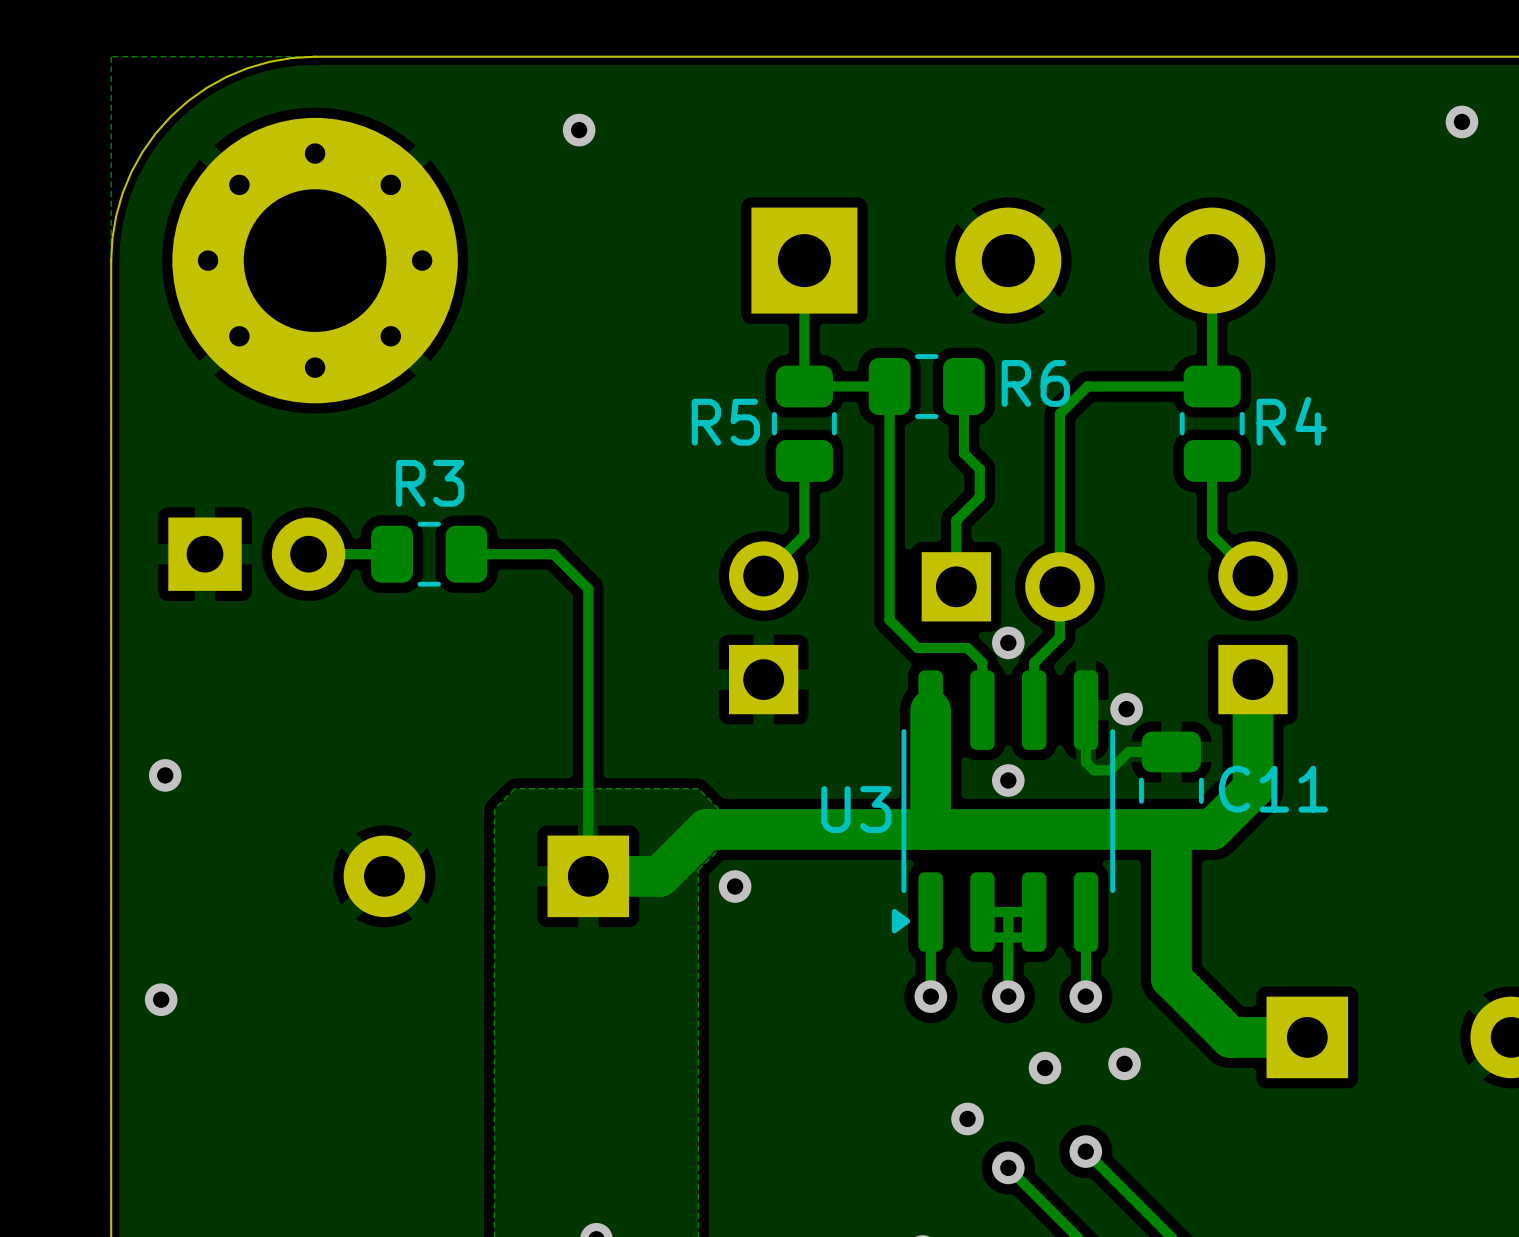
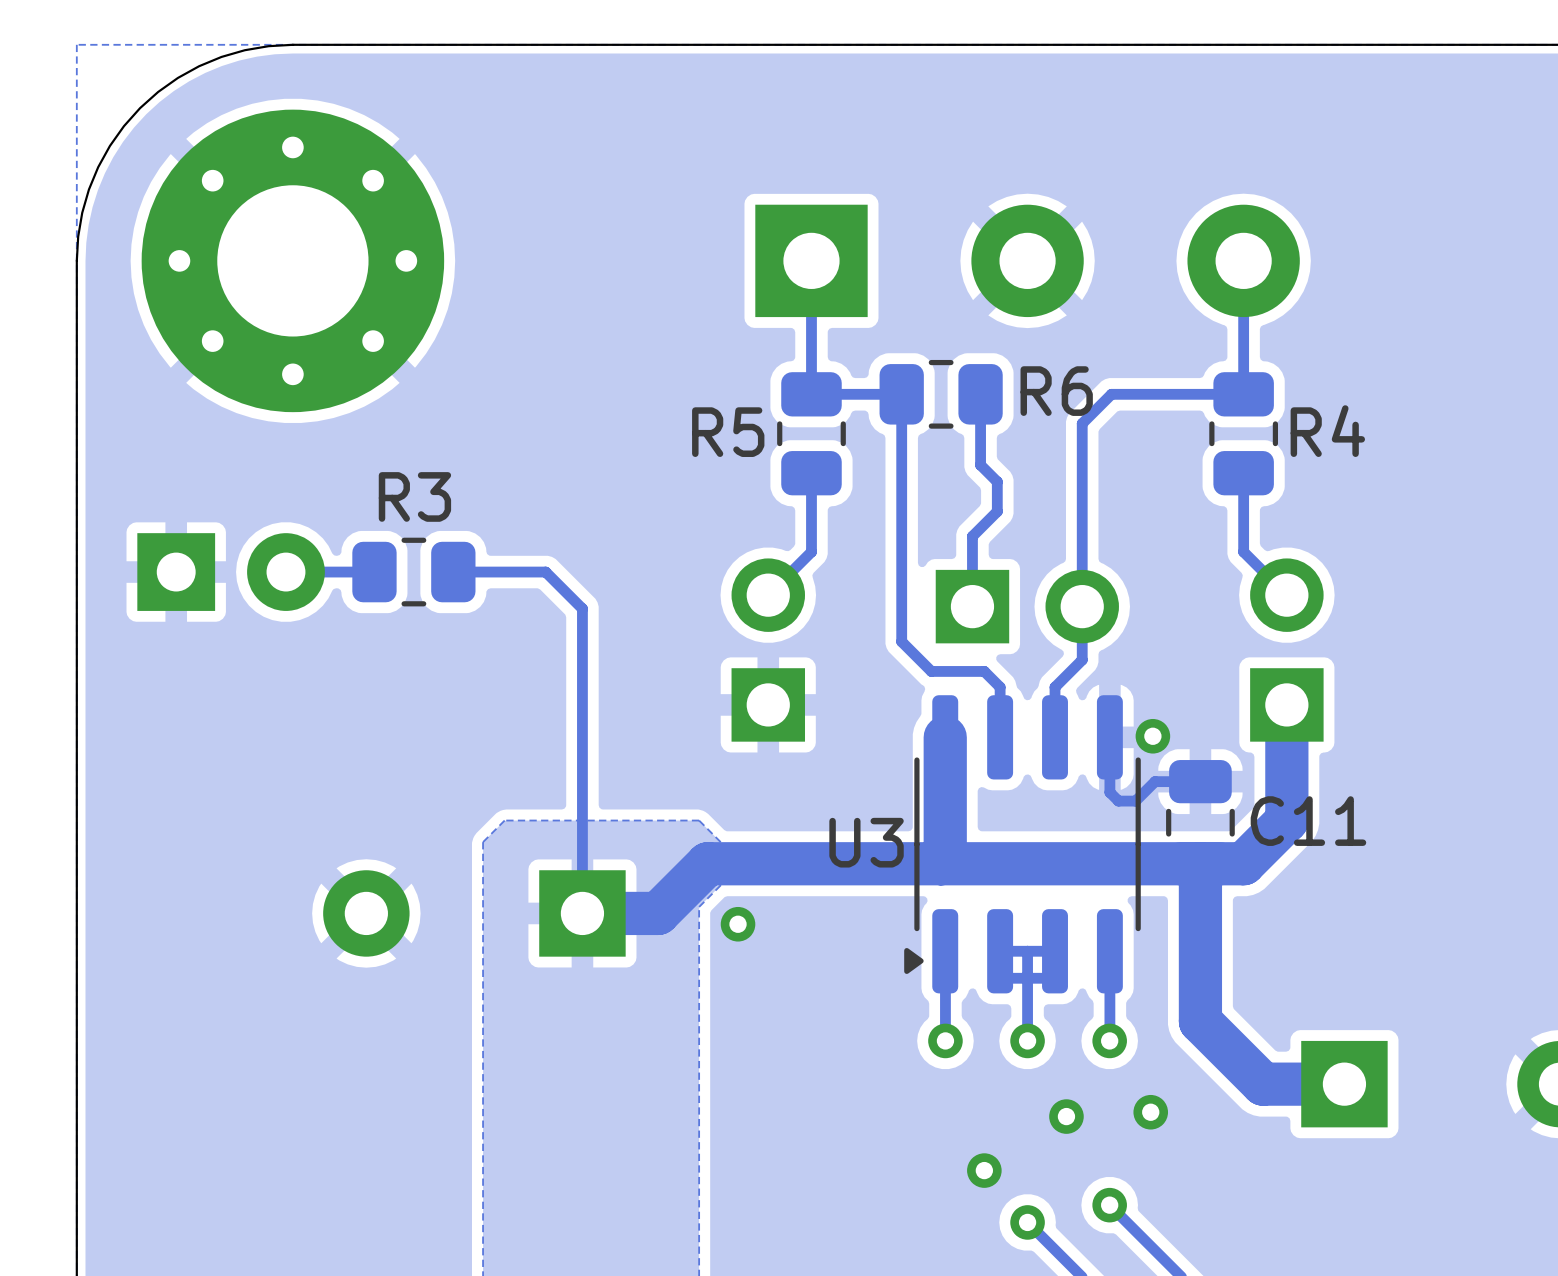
via: (1461, 121) -> none
via: (579, 130) -> none
via: (1008, 642) -> none
via: (165, 775) -> none
via: (1008, 780) -> none
via: (161, 999) -> none

